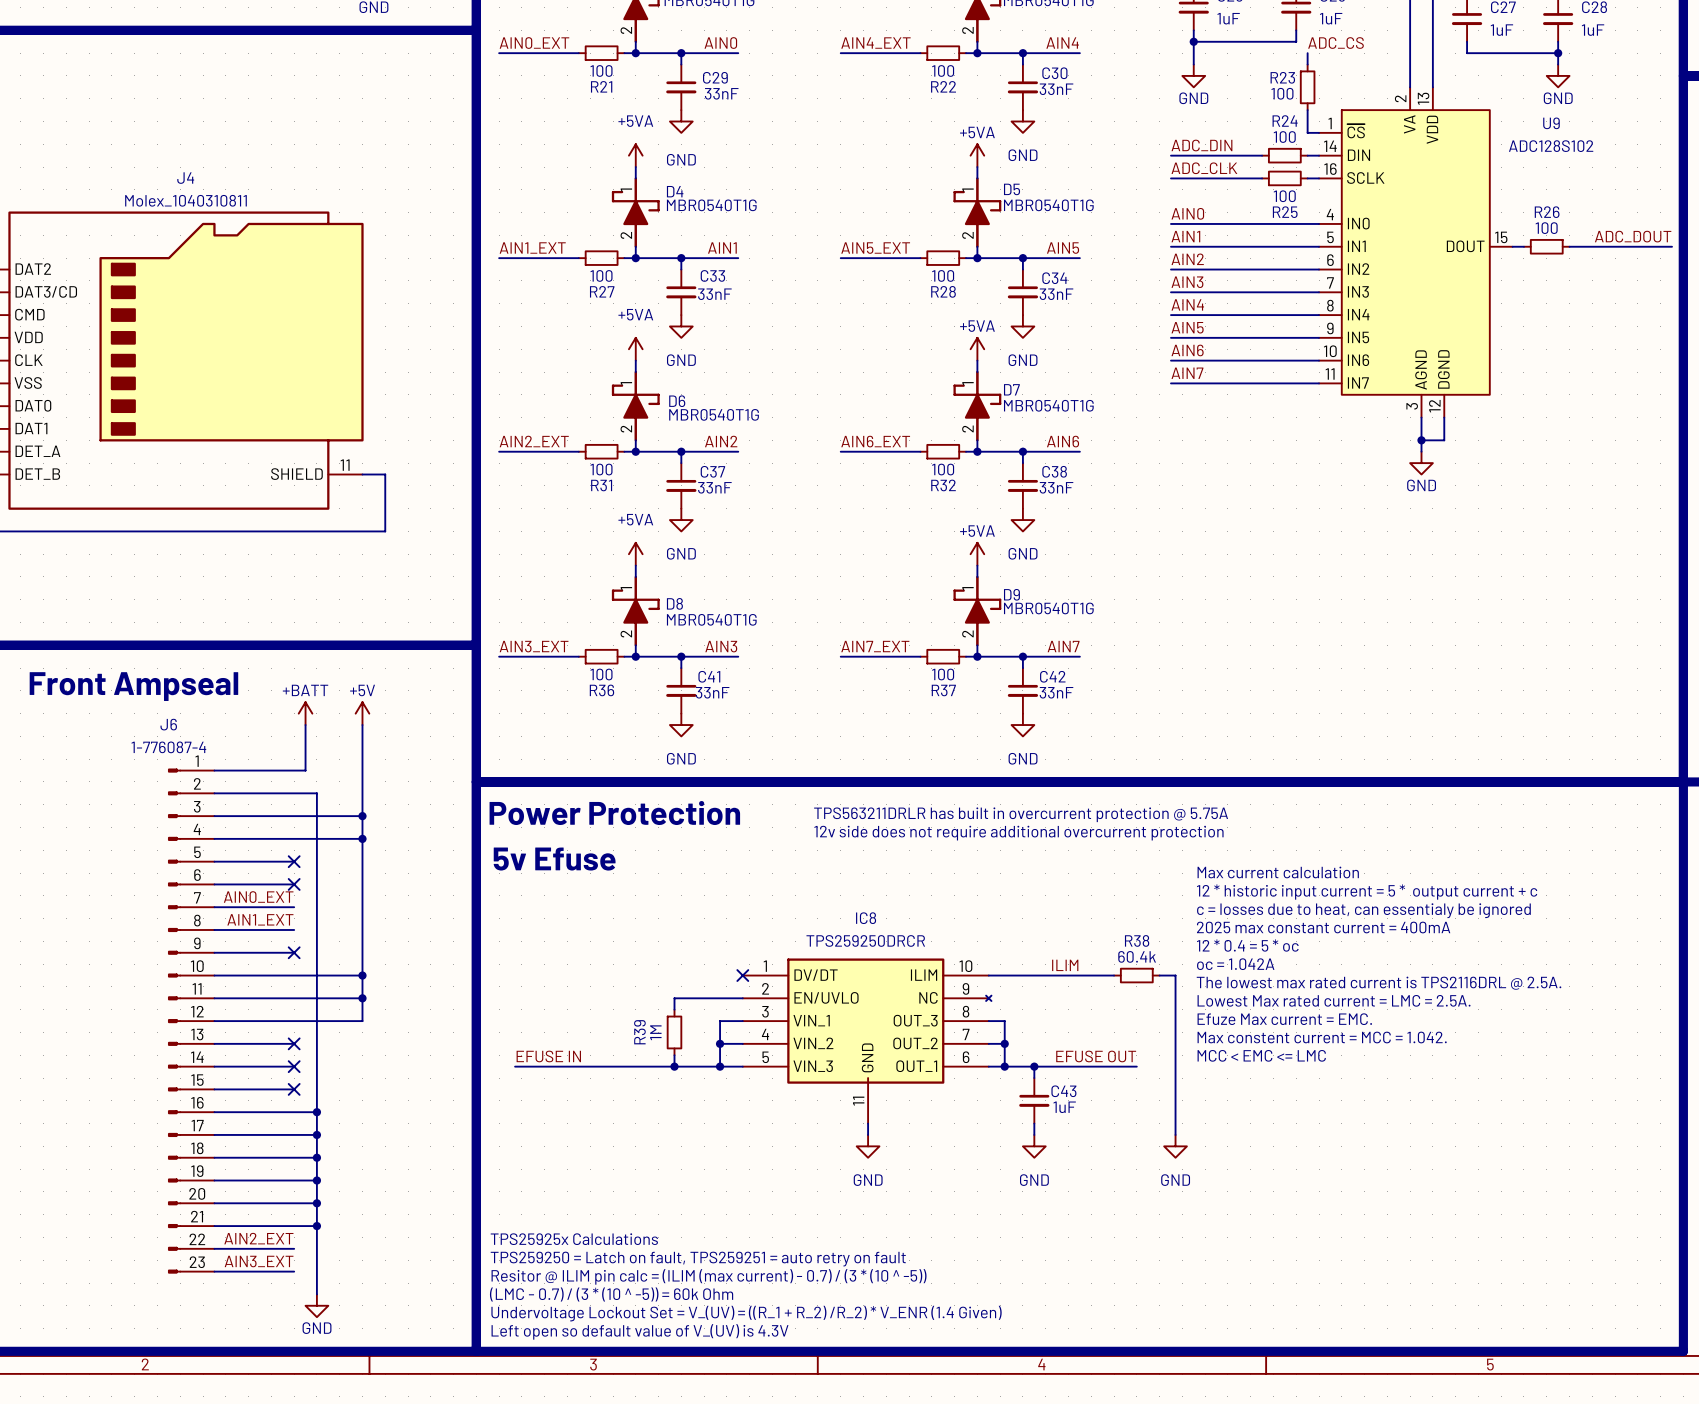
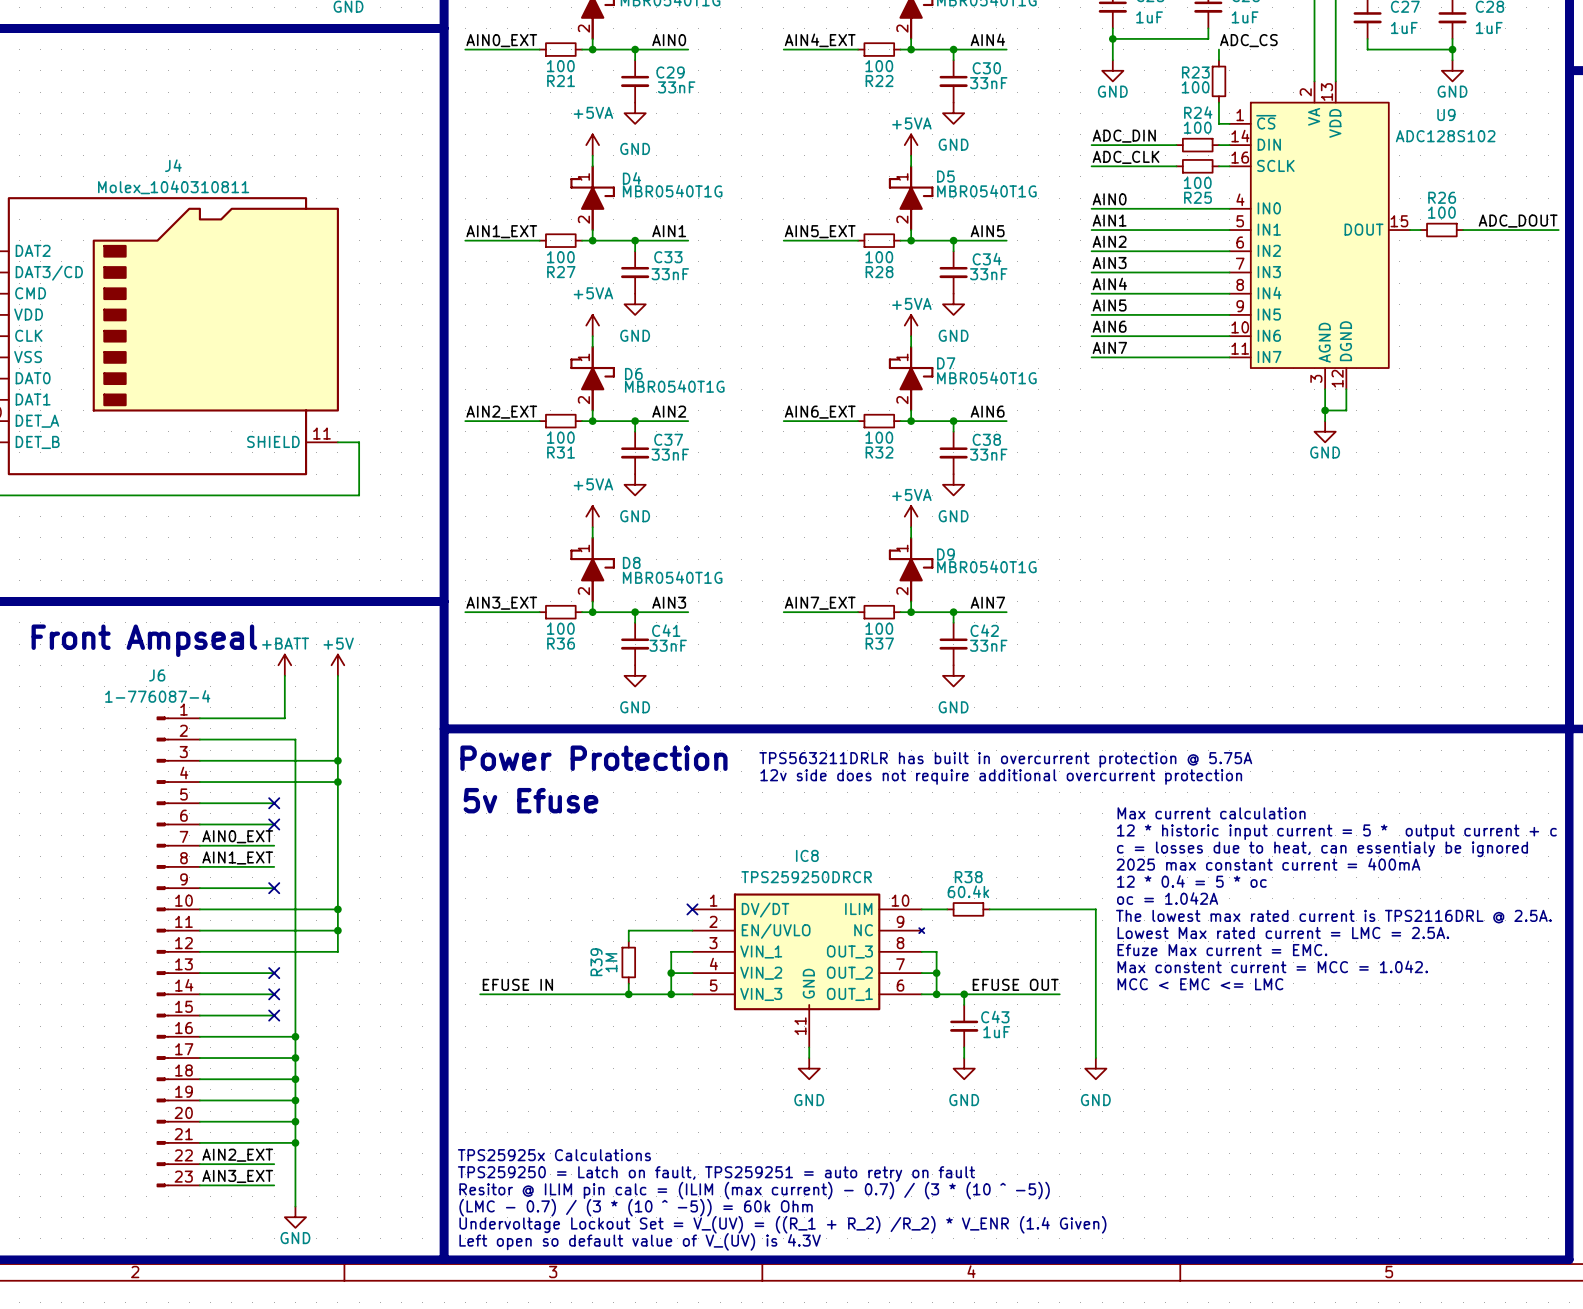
label: ILIM (1065, 965) -> none
wire: (1016, 975) (1061, 975) -> (1038, 909) (1080, 909)
R38 position: (1136, 975) -> (968, 909)

